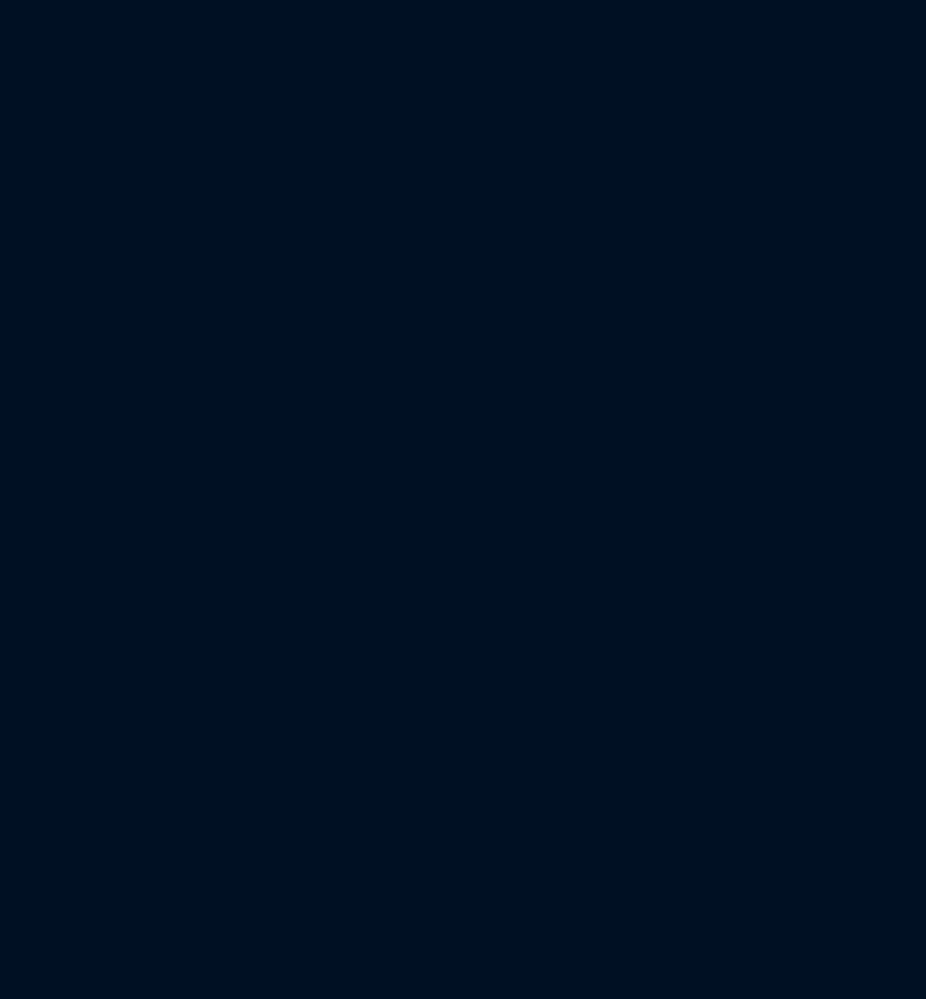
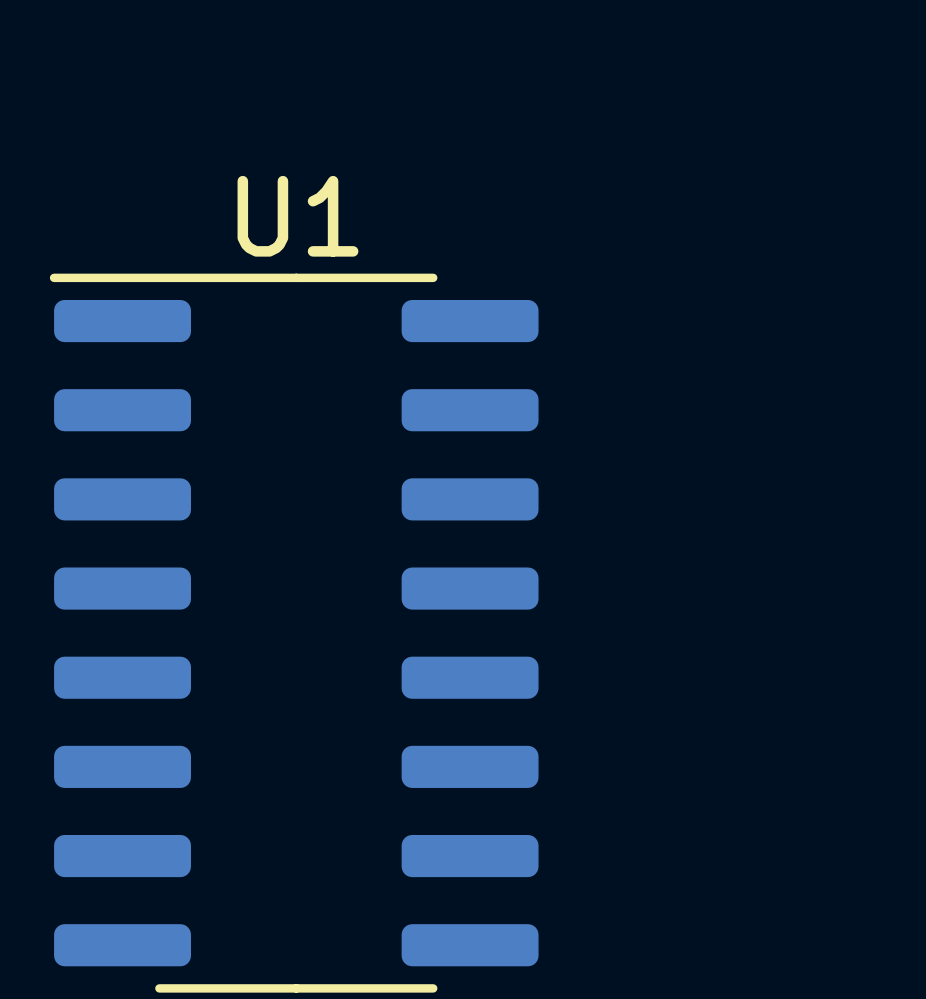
U1: none -> (294, 633)

